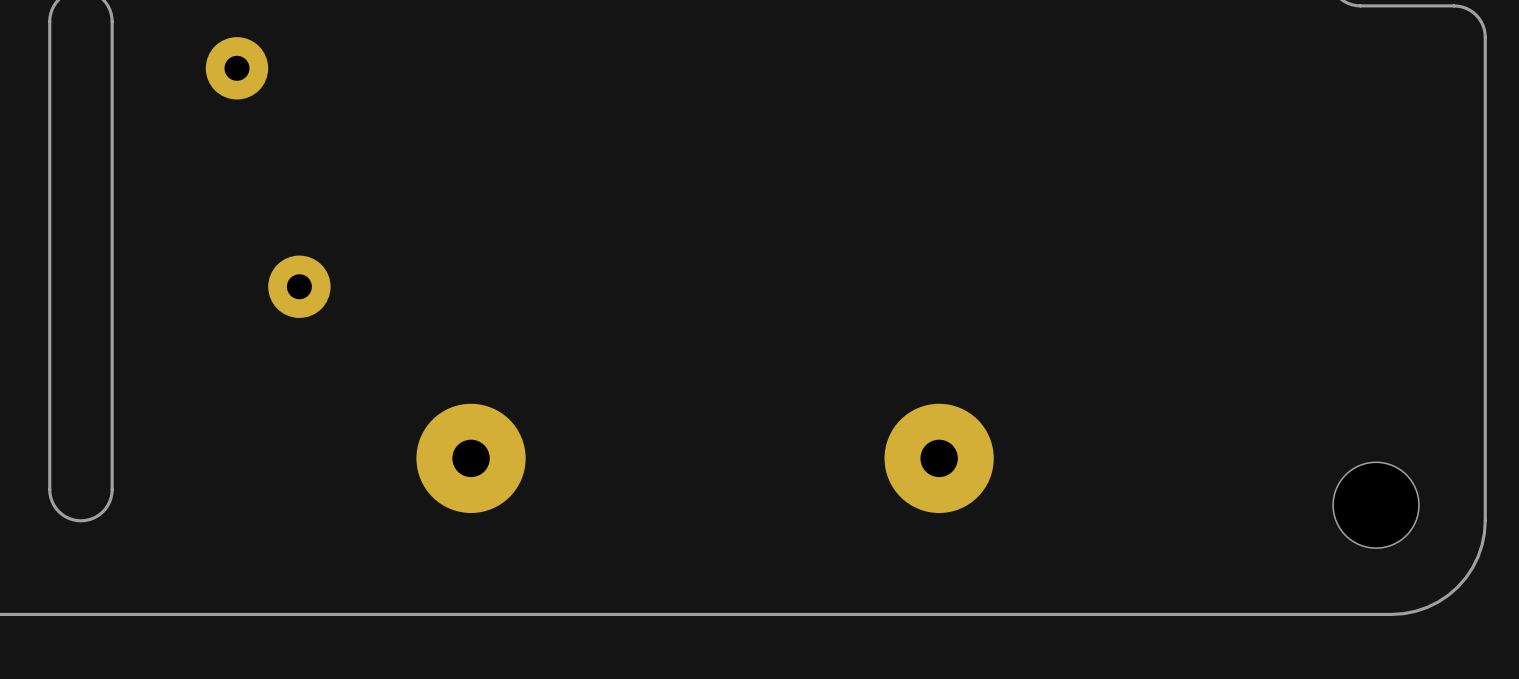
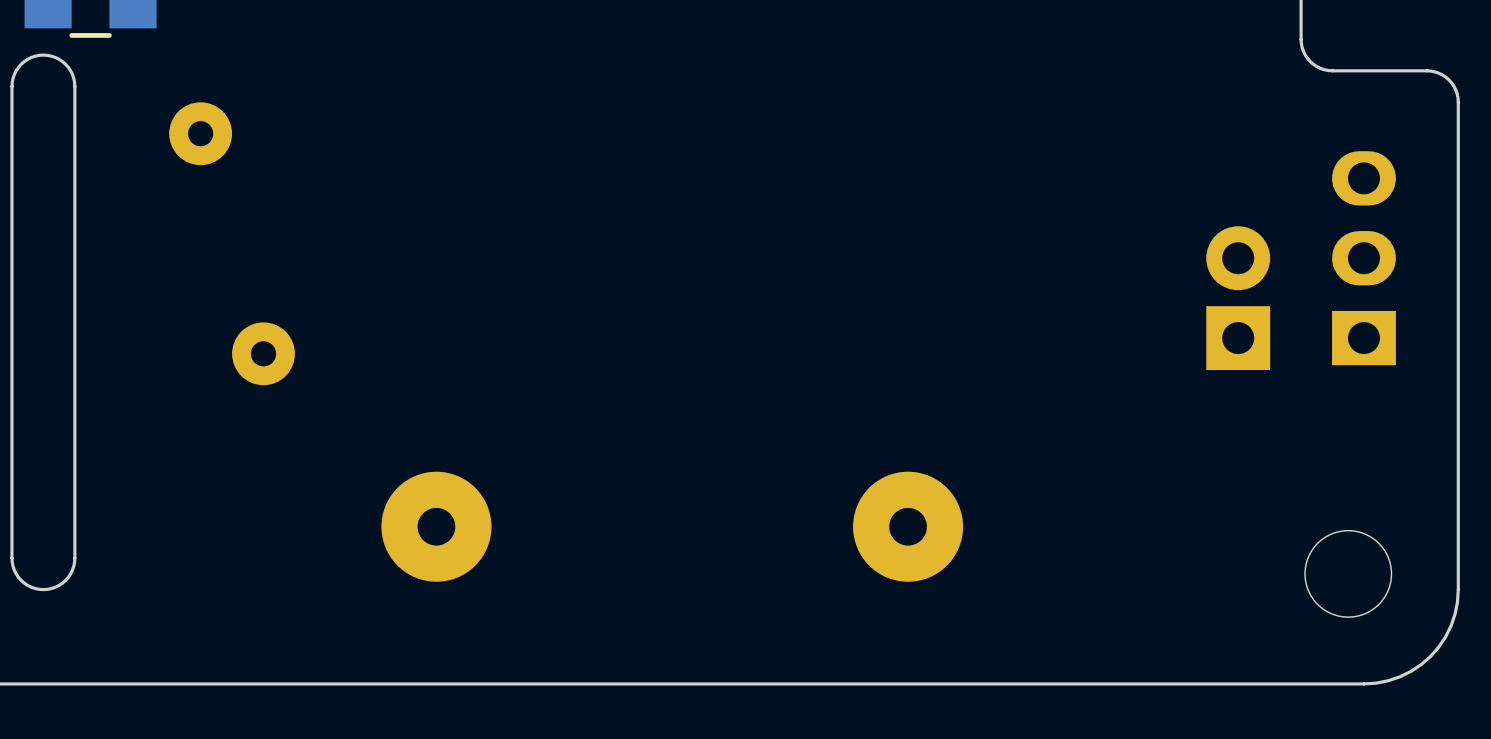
part: none -> (1363, 258)
part: none -> (1238, 298)

